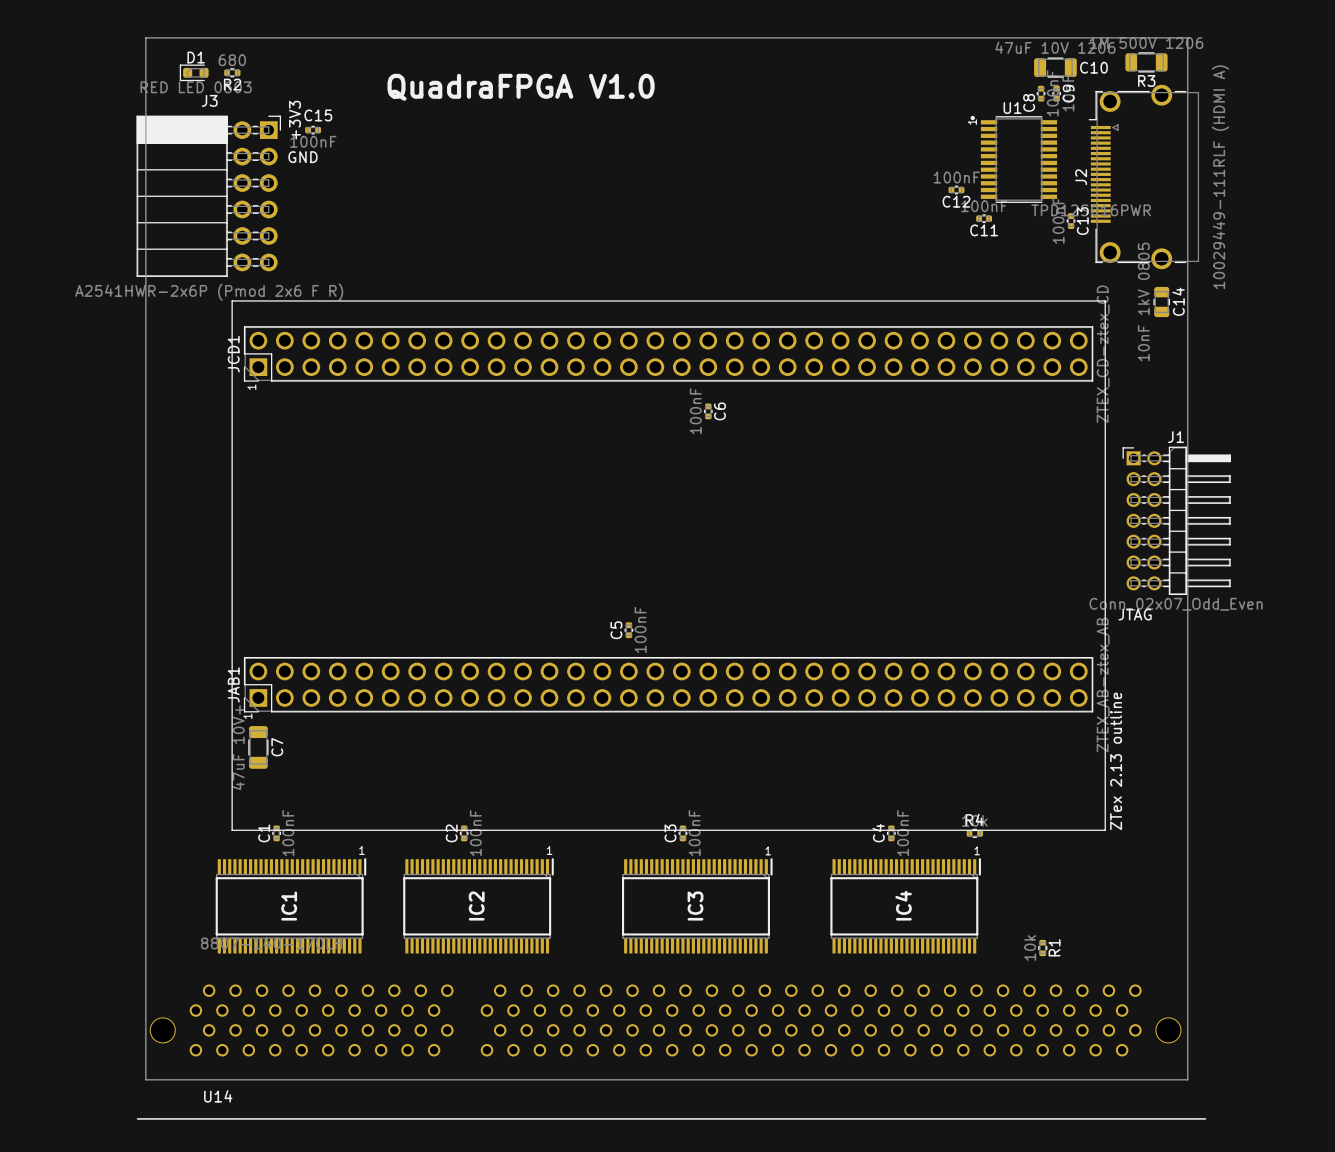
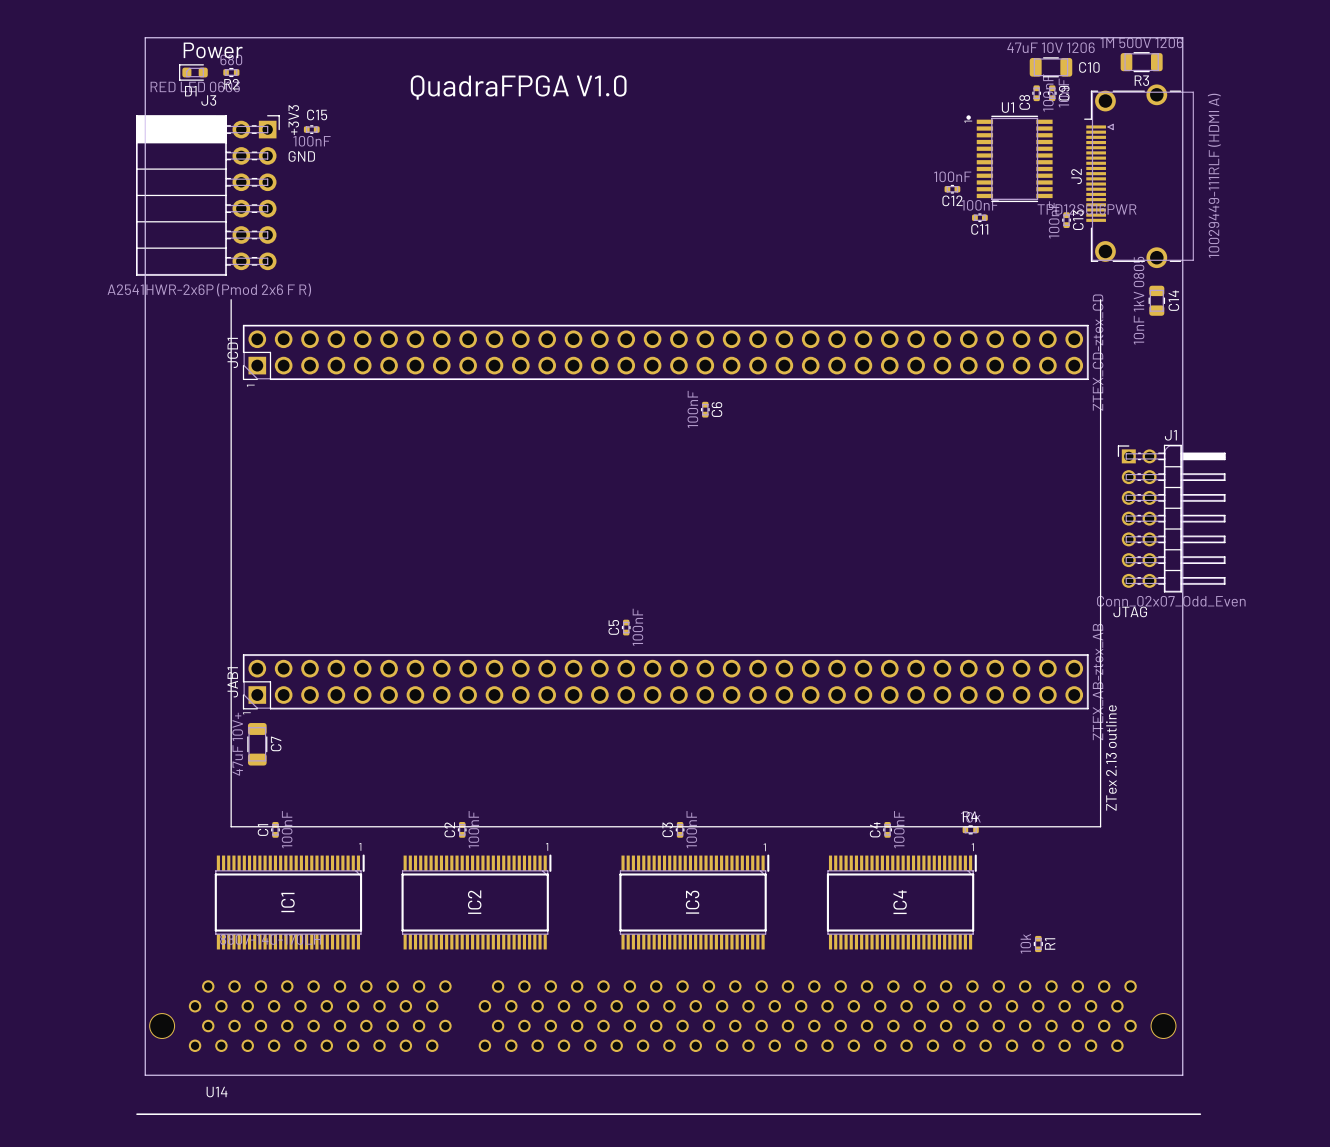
text: none -> Power (213, 50)
D1 name position: D1 (196, 57) -> D1 (190, 91)
line: (232, 300) (1105, 300) -> none

